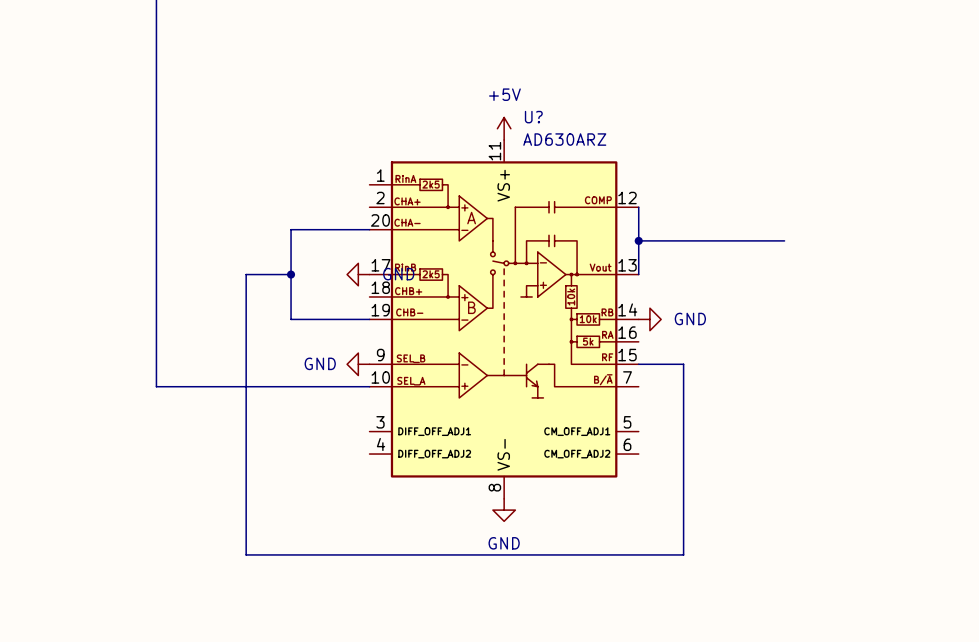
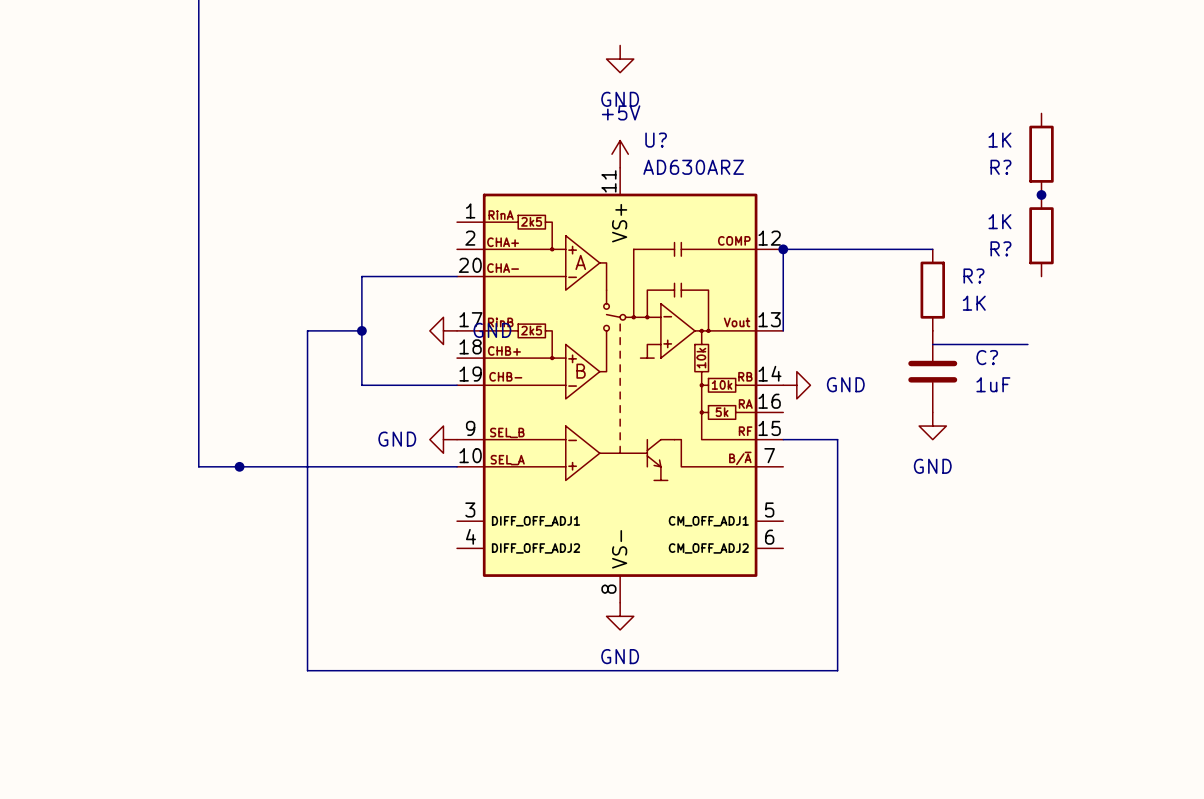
power symbol: none -> GND (620, 59)
R?: none -> 1K (1041, 154)
junction: none -> (1041, 194)
R?: none -> 1K (1041, 235)
wire: none -> (783, 249) (932, 249)
wire: (638, 240) (784, 240) -> none
junction position: (638, 240) -> (783, 249)
R?: none -> 1K (932, 290)
wire: none -> (932, 344) (1027, 344)
C?: none -> 1uF (932, 371)
power symbol: none -> GND (932, 426)
junction: none -> (239, 466)

